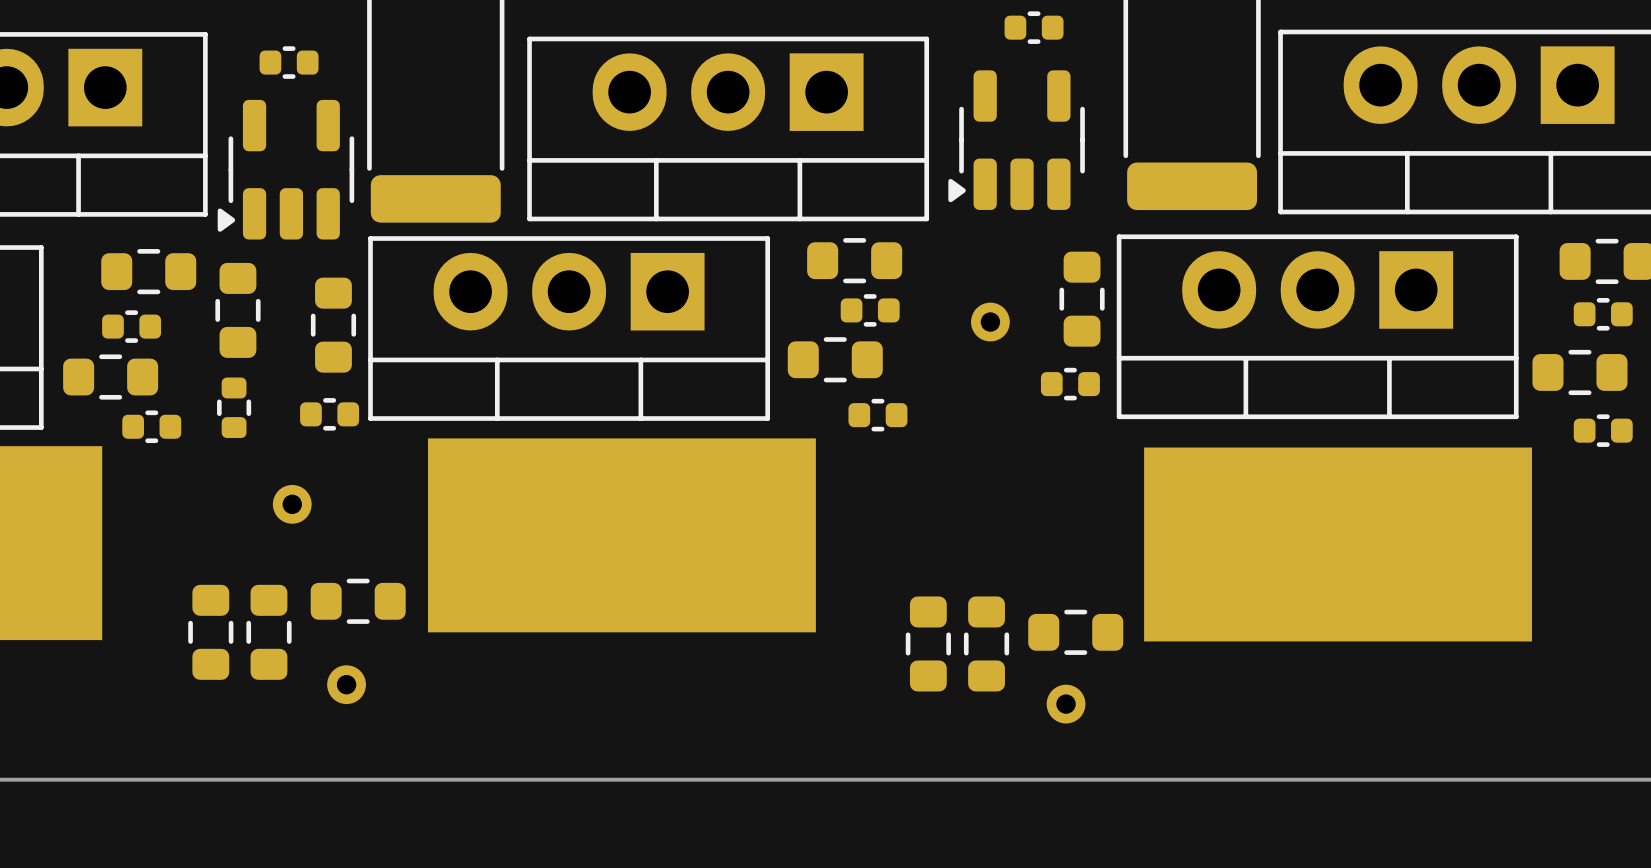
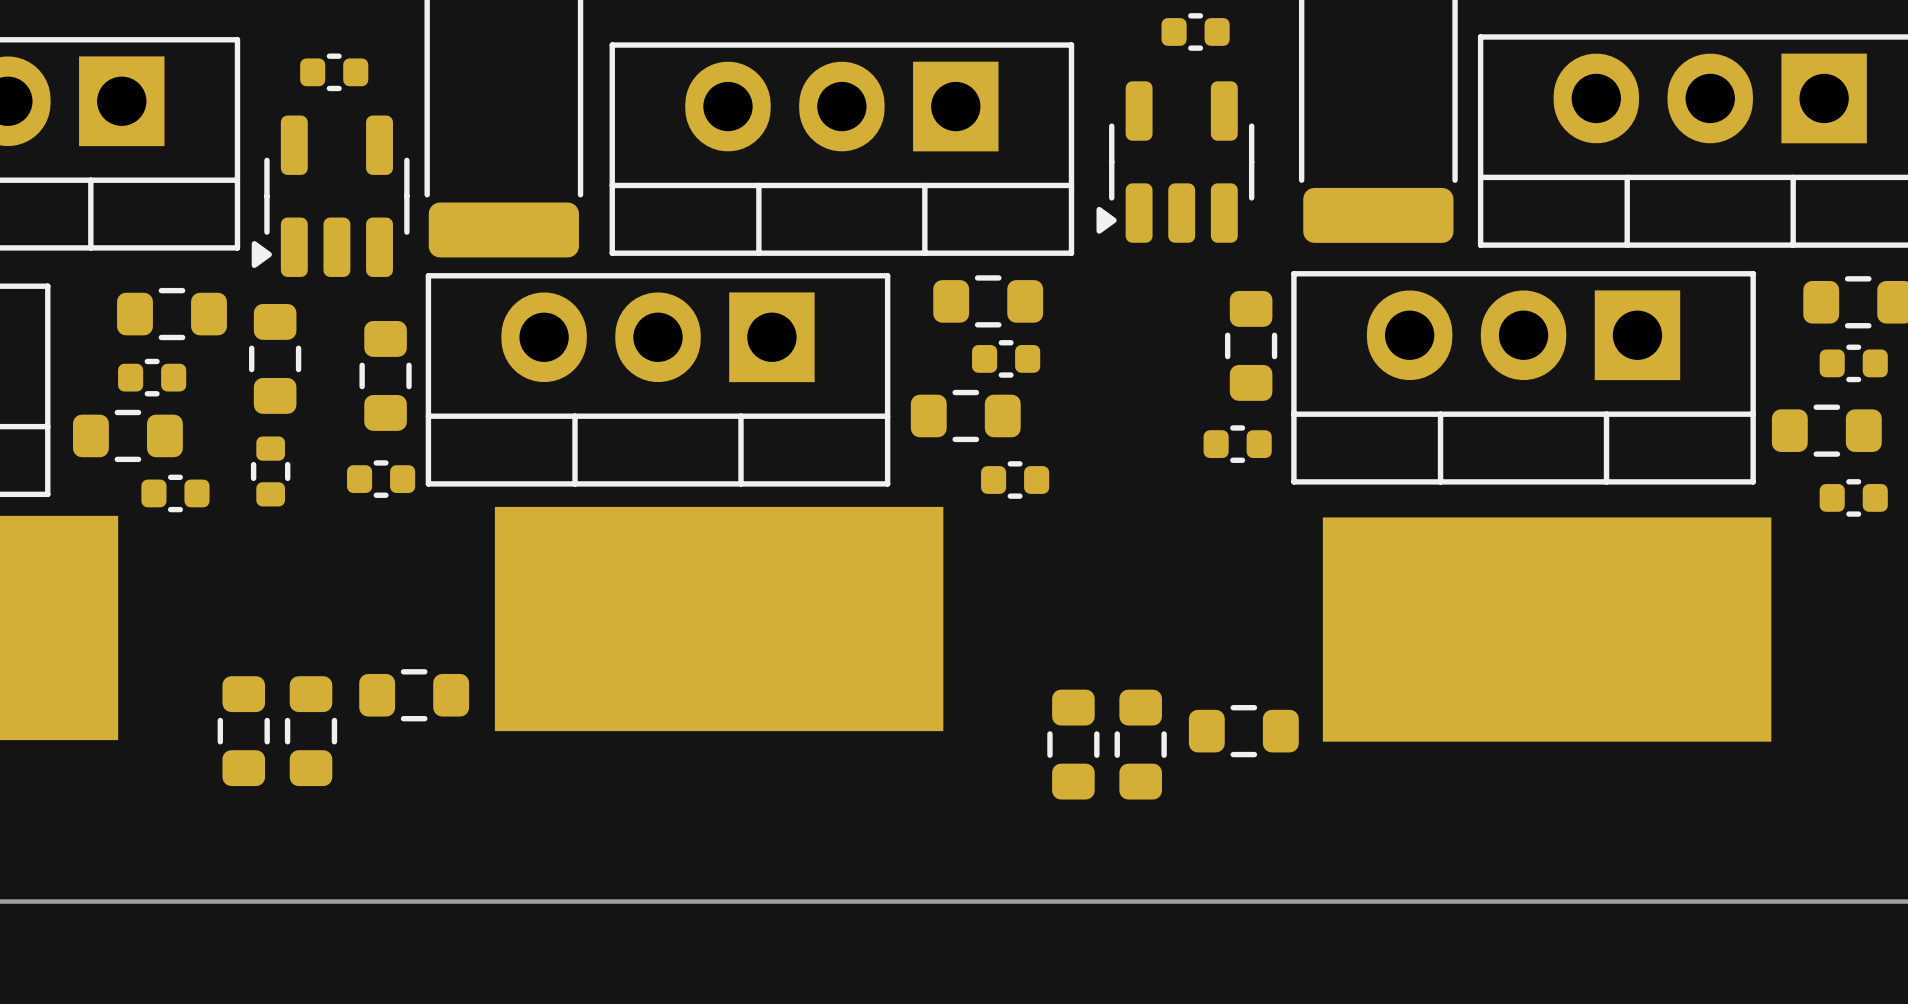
part: (990, 322) -> none
part: (292, 504) -> none
part: (346, 684) -> none
part: (1066, 704) -> none

